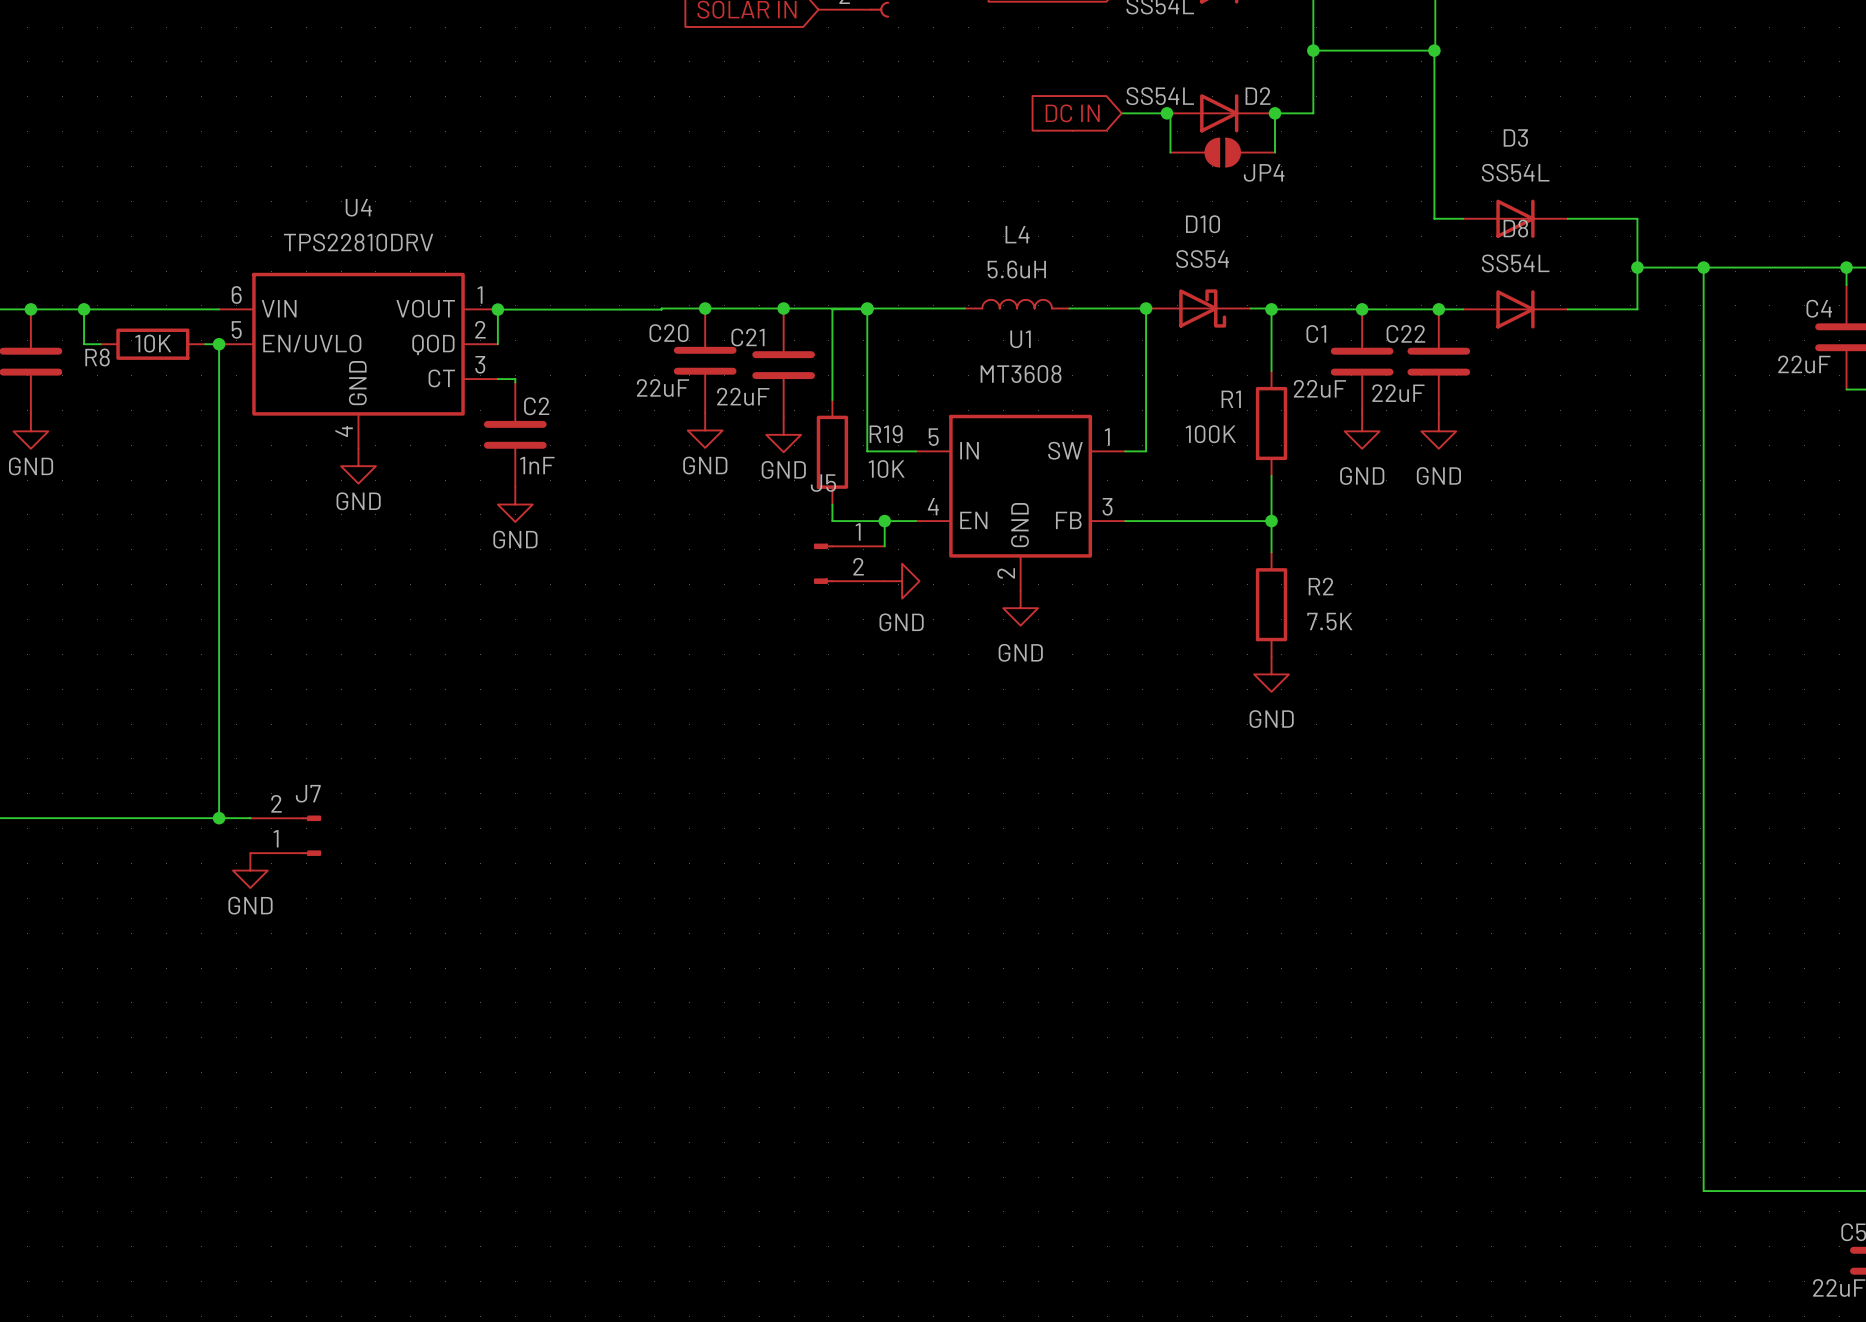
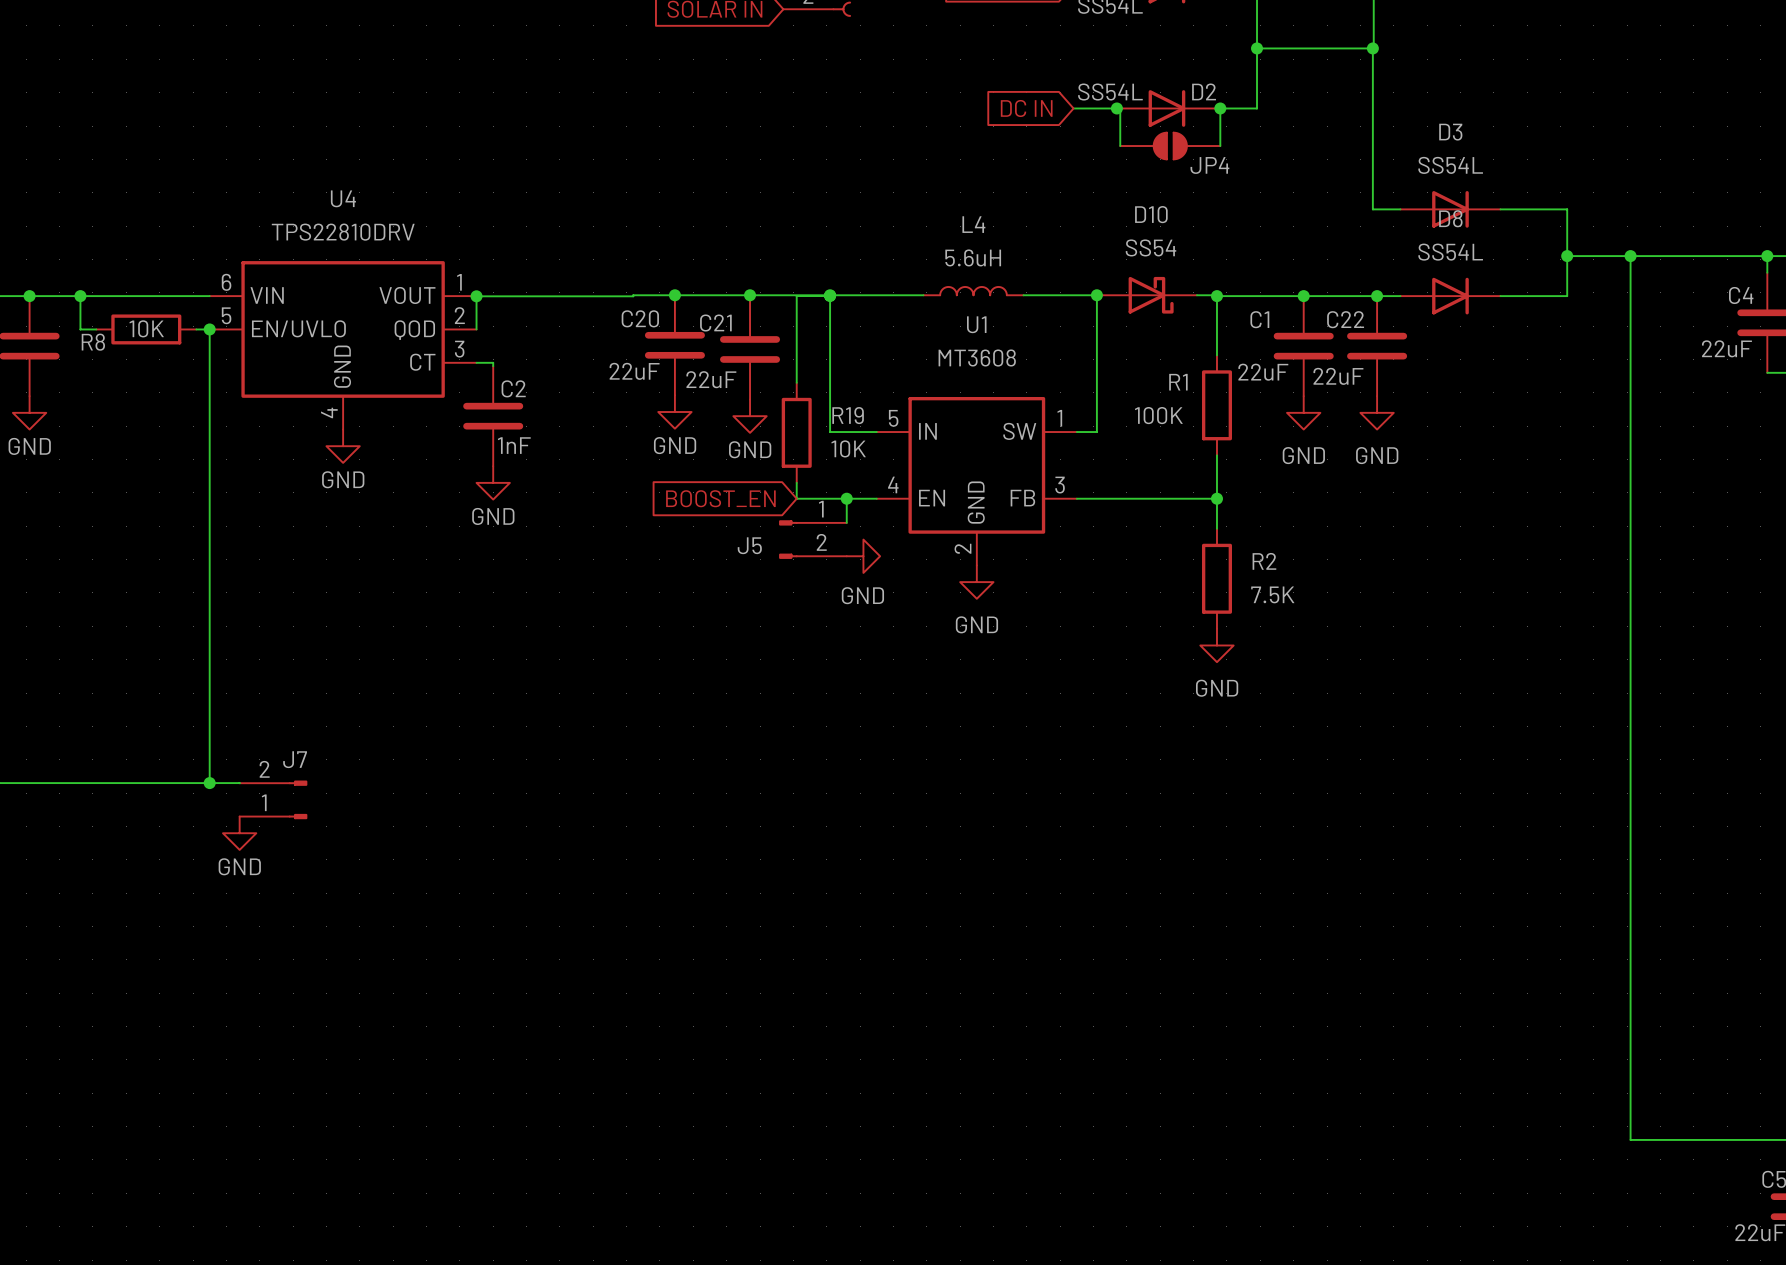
J5 name position: J5 (823, 483) -> J5 (749, 545)
global label: none -> BOOST_EN (720, 498)

